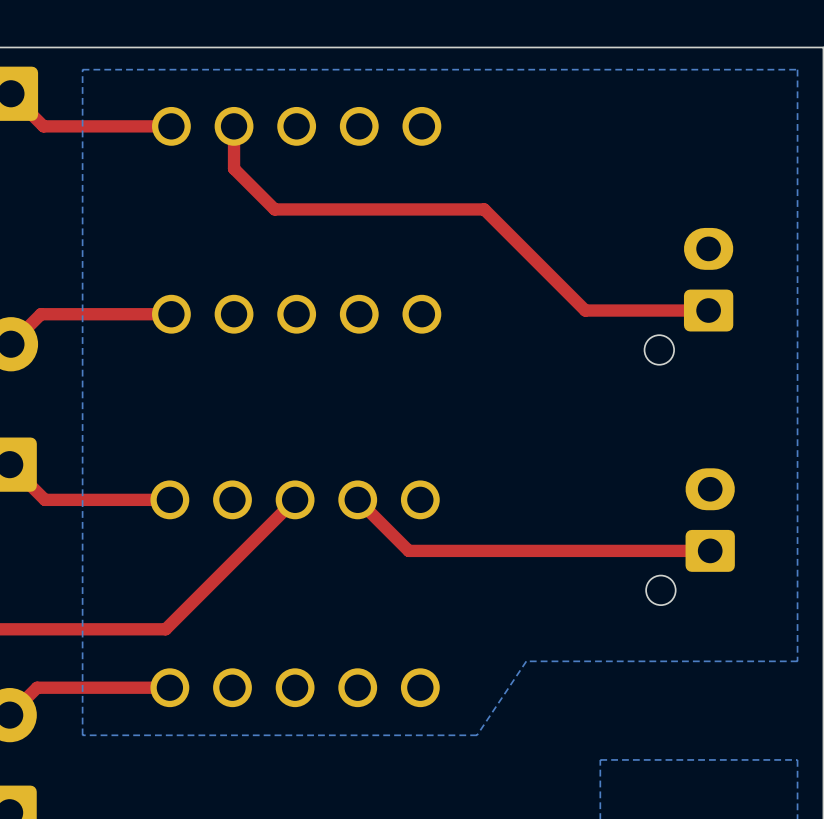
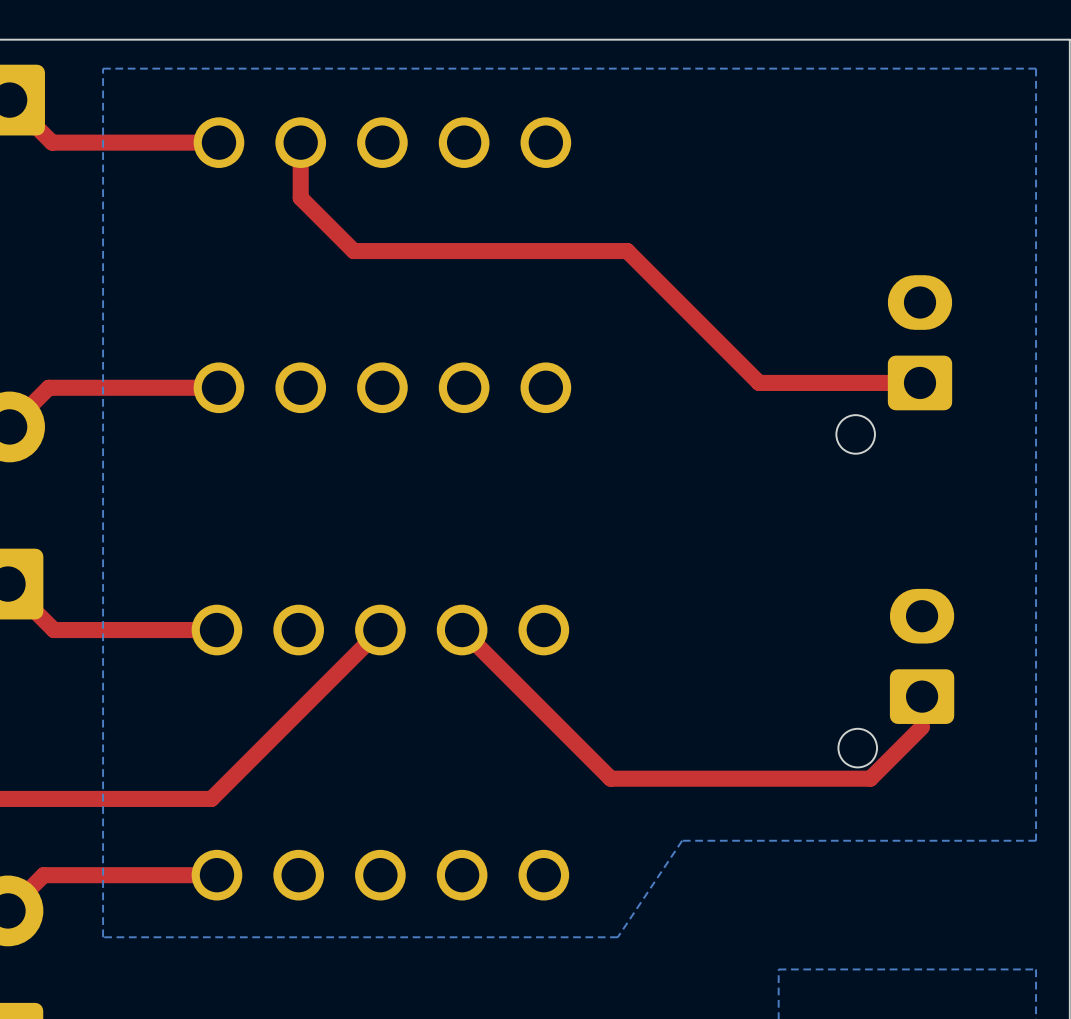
top track: (710, 550) (408, 550) -> (922, 696) (922, 727) (870, 778) (610, 778) (528, 696)

